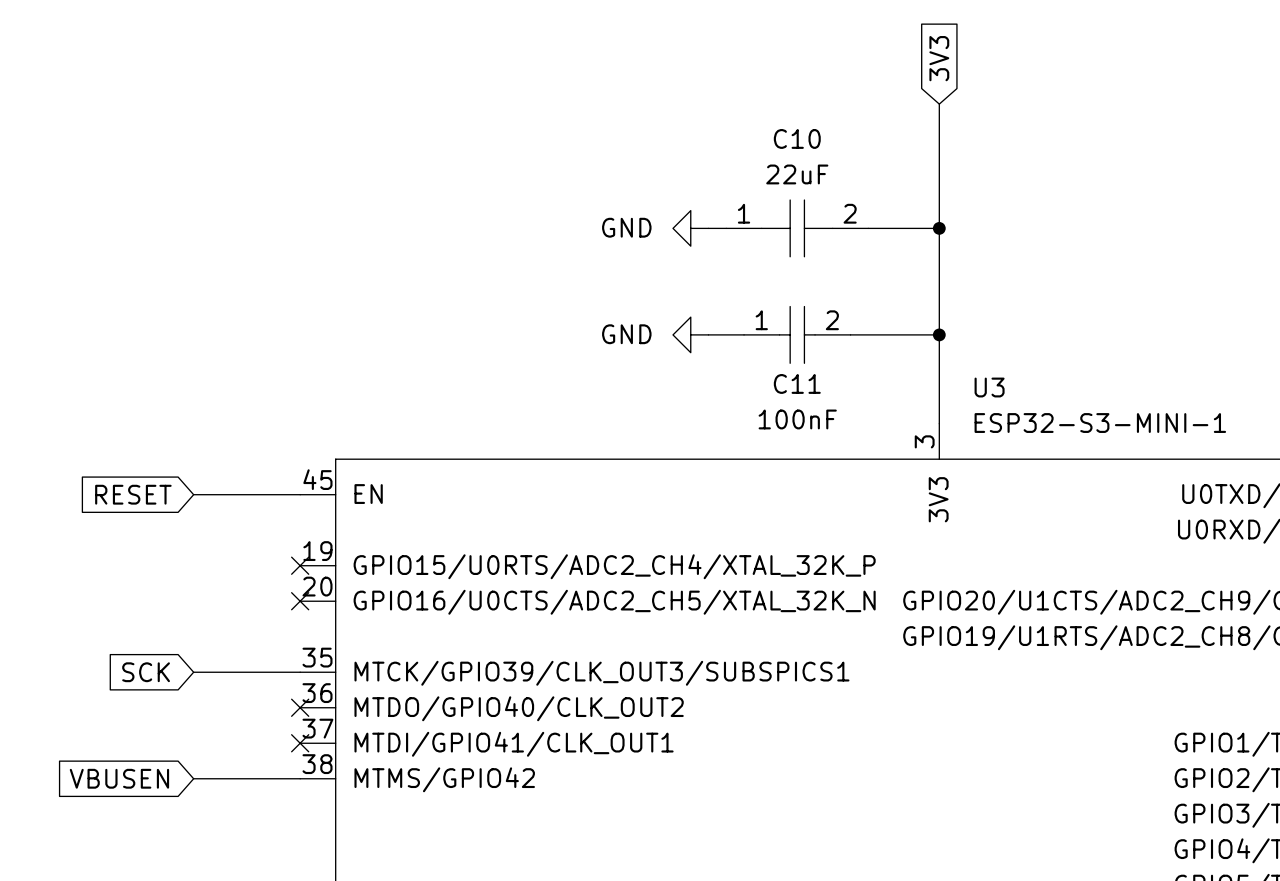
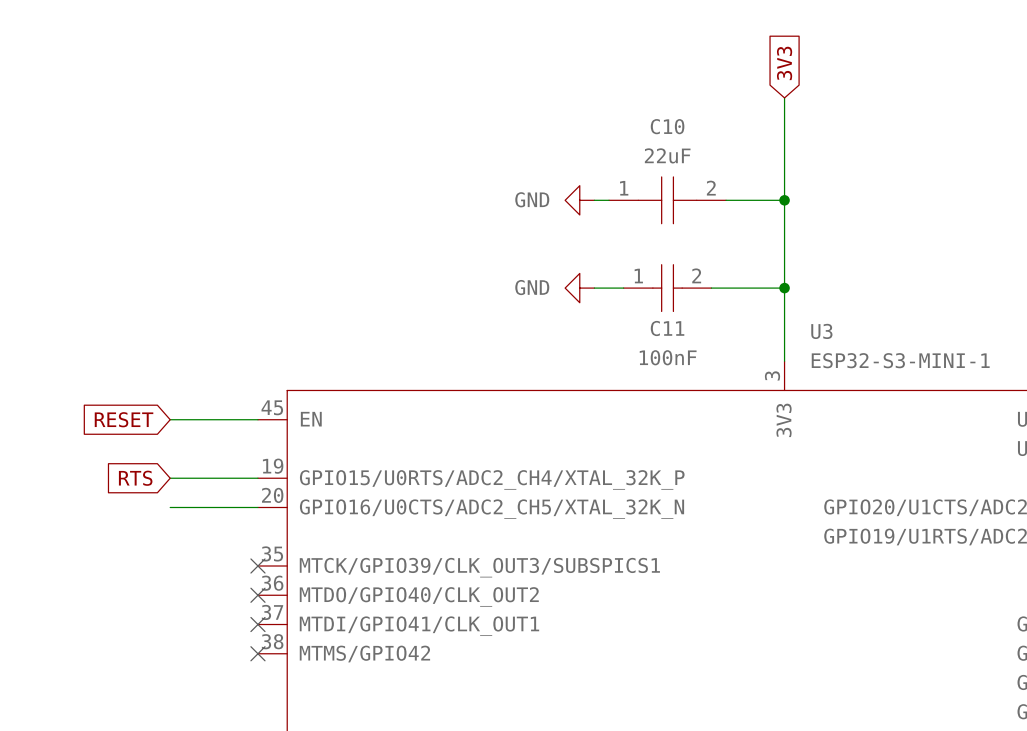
global label: none -> RTS (135, 478)
no-connect mark: (300, 565) -> none
no-connect mark: (300, 601) -> none
global label: SCK (146, 672) -> none
wire: (193, 672) (300, 672) -> (170, 507) (257, 507)
no-connect mark: none -> (257, 566)
global label: VBUSEN (119, 778) -> none
wire: (193, 778) (300, 778) -> (170, 478) (257, 478)
no-connect mark: none -> (257, 653)

